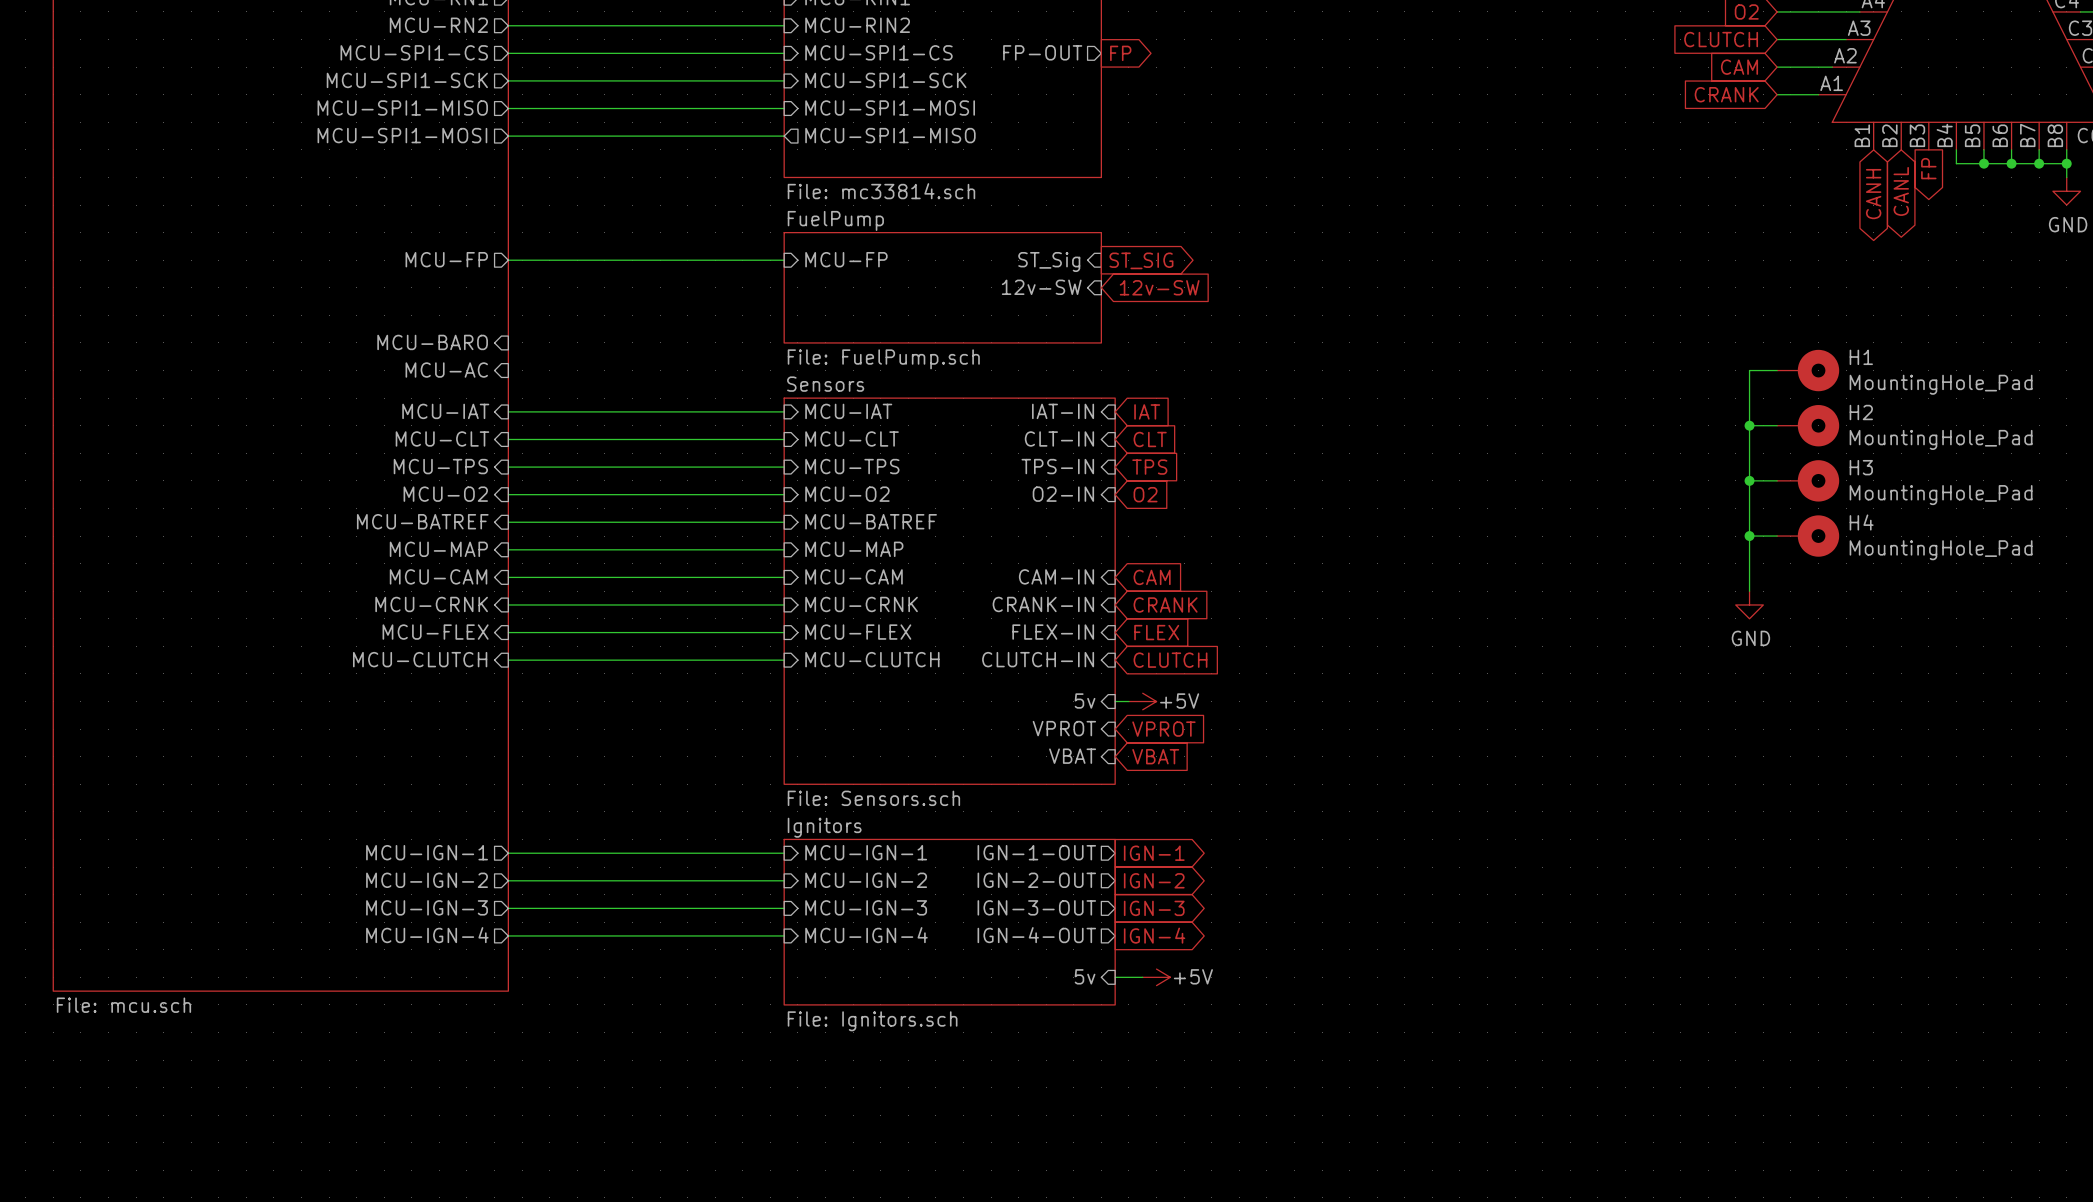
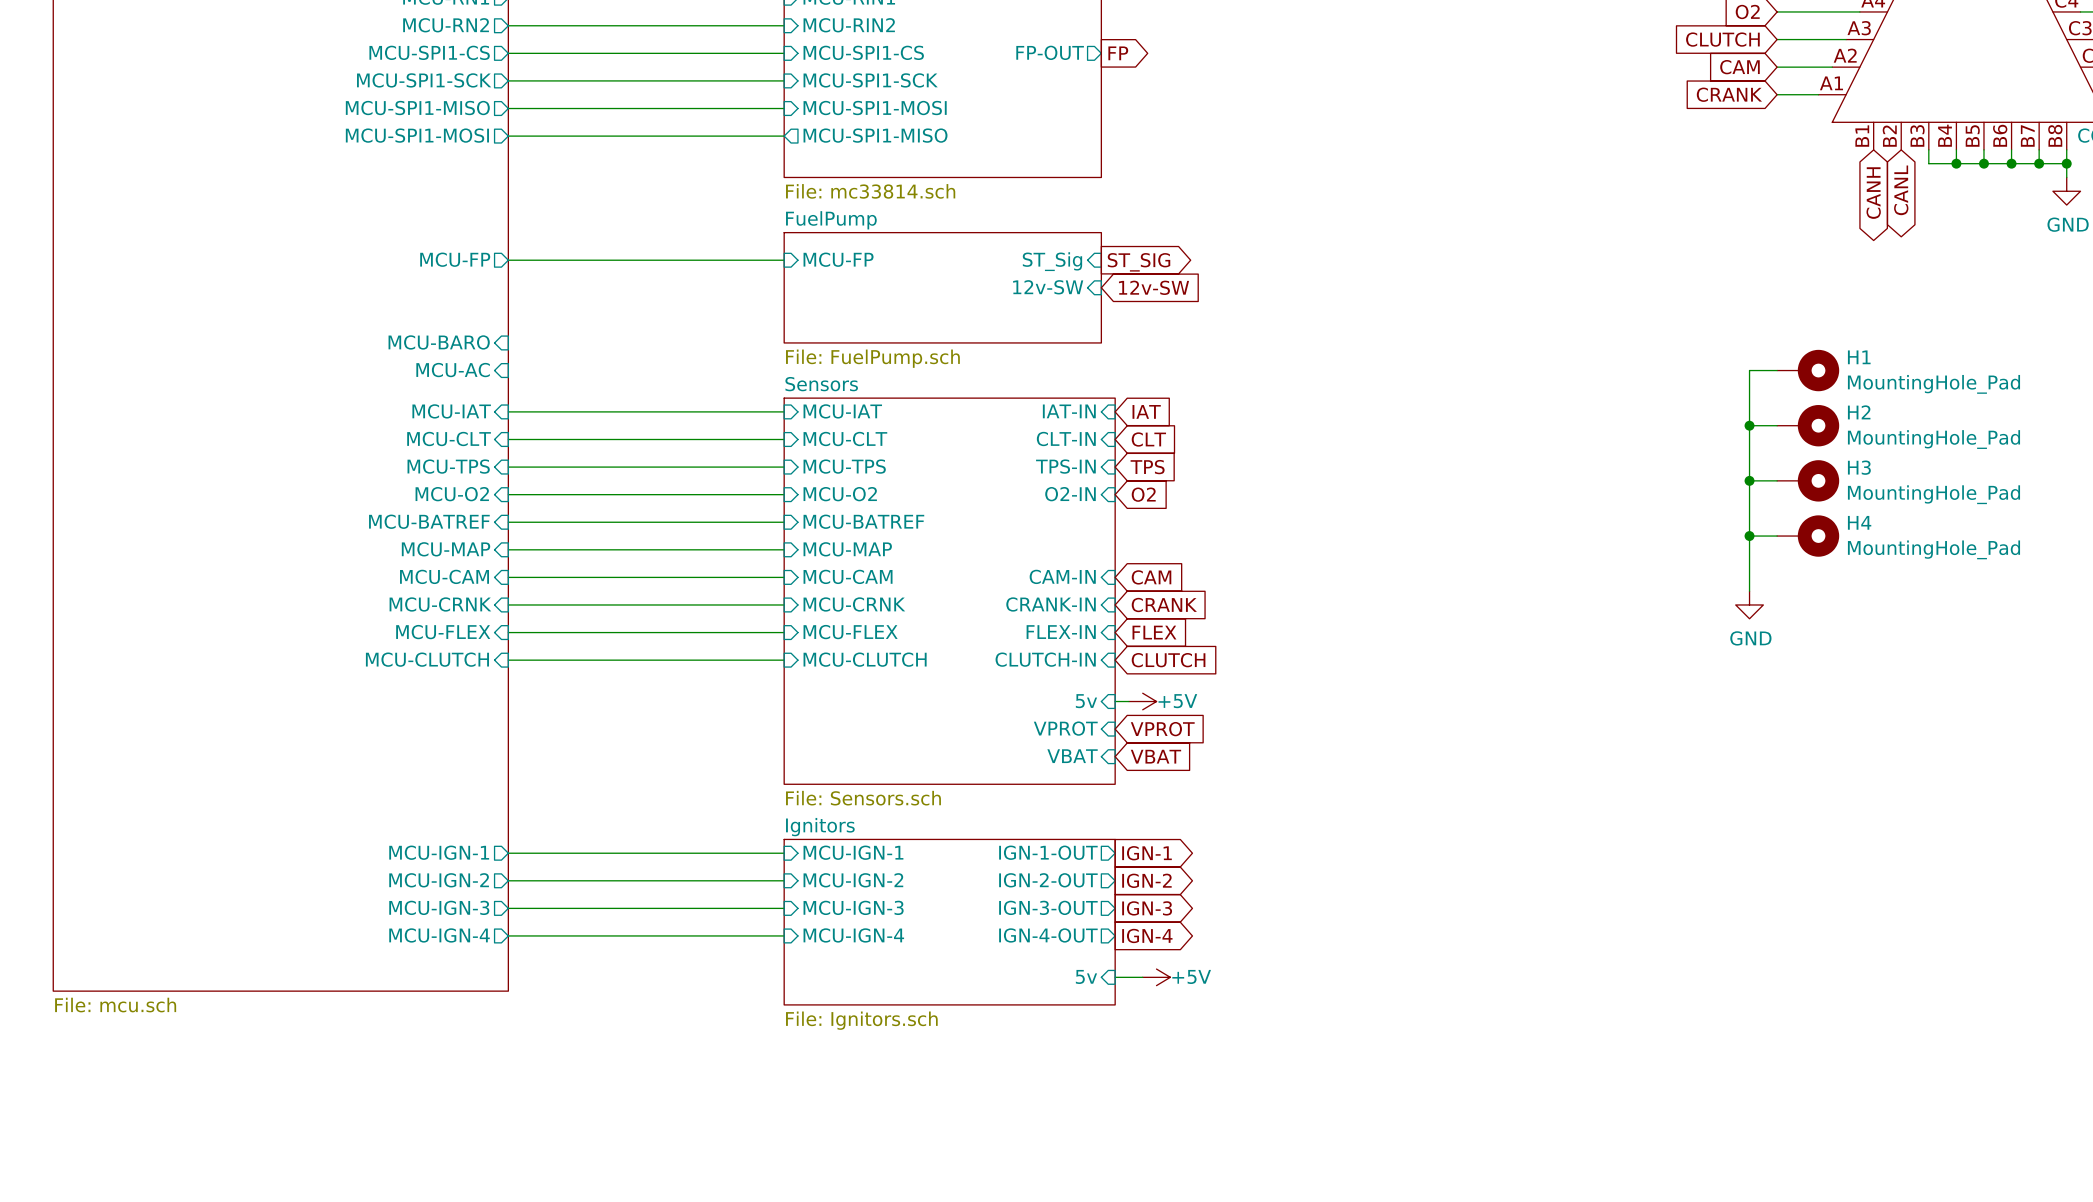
wire: none -> (1928, 149) (1928, 163) (1956, 163)
junction: none -> (1956, 163)
global label: FP (1928, 168) -> none

